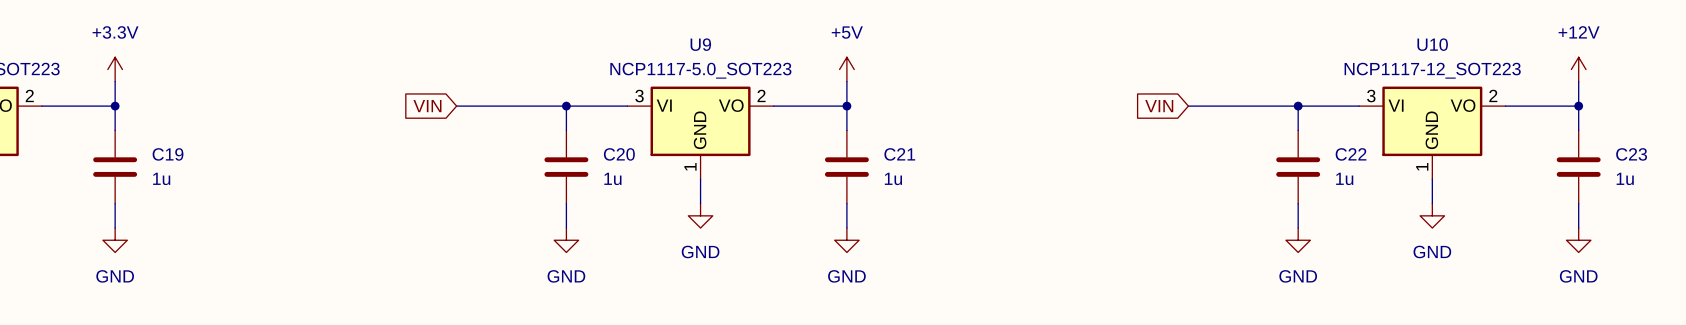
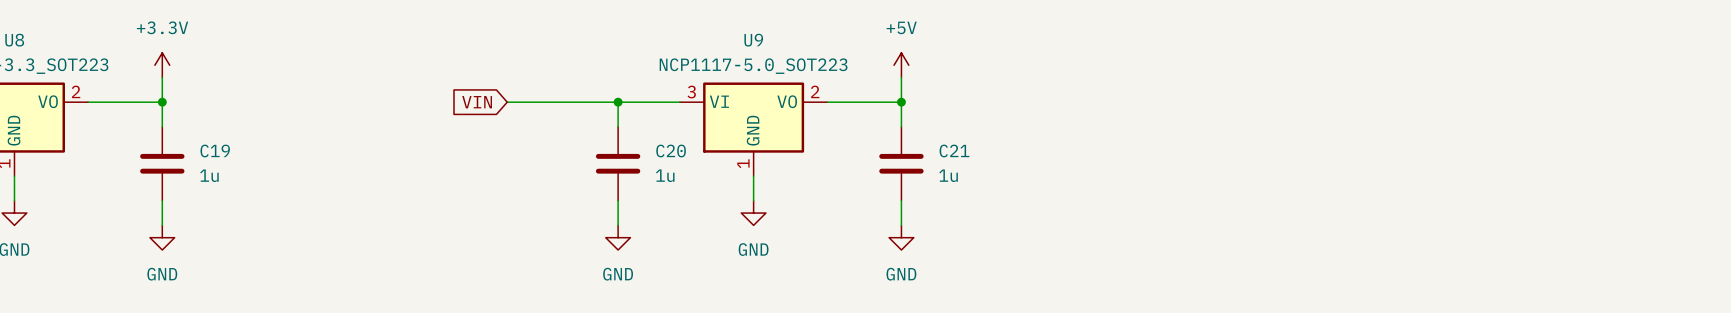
power symbol: +12V (1578, 69) -> none
wire: (1578, 81) (1578, 130) -> none
global label: VIN (1159, 106) -> none
wire: (1188, 106) (1359, 106) -> none
wire: (1298, 106) (1298, 130) -> none
junction: (1298, 106) -> none
wire: (1505, 106) (1578, 106) -> none
junction: (1578, 106) -> none
U10: NCP1117-12_SOT223 (1432, 132) -> none
C22: 1u (1298, 167) -> none
C23: 1u (1578, 167) -> none
wire: (1432, 179) (1432, 203) -> none
wire: (1298, 203) (1298, 228) -> none
wire: (1578, 203) (1578, 228) -> none
power symbol: GND (1432, 215) -> none
power symbol: GND (1298, 240) -> none
power symbol: GND (1578, 240) -> none

